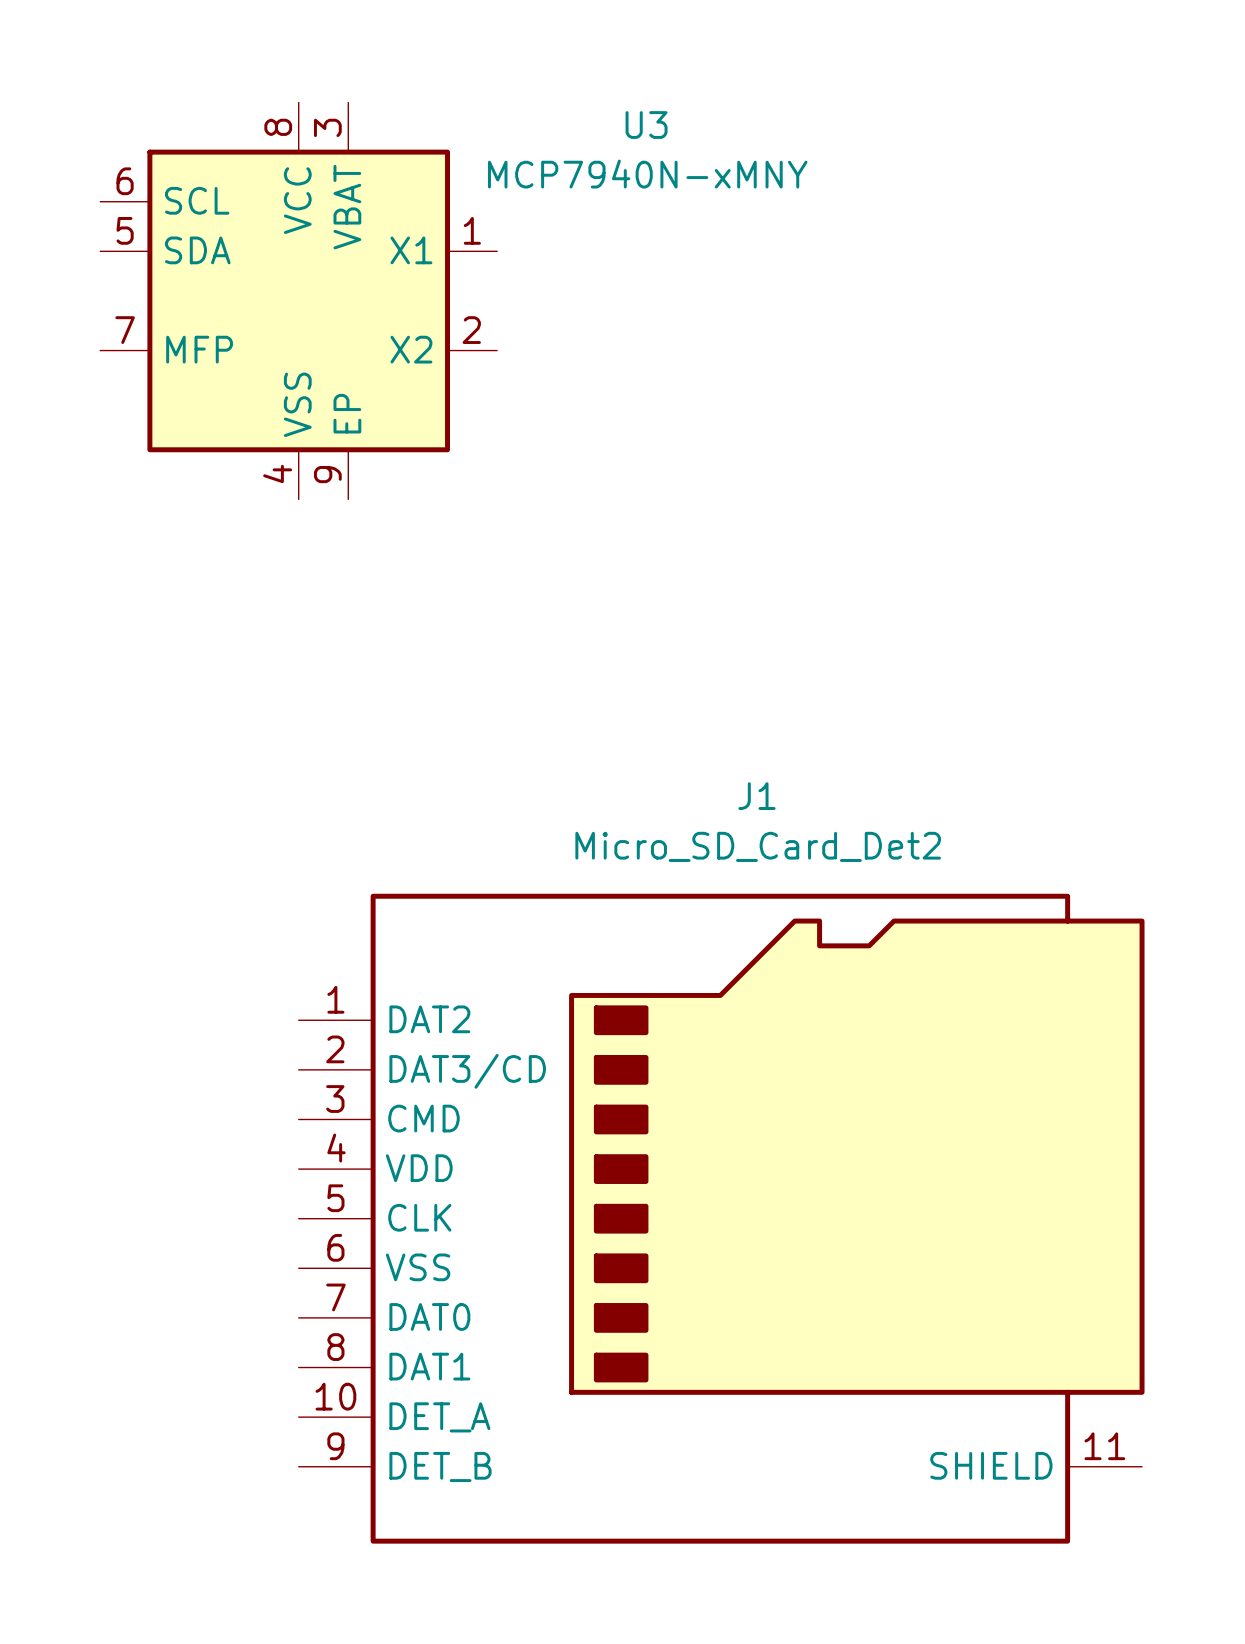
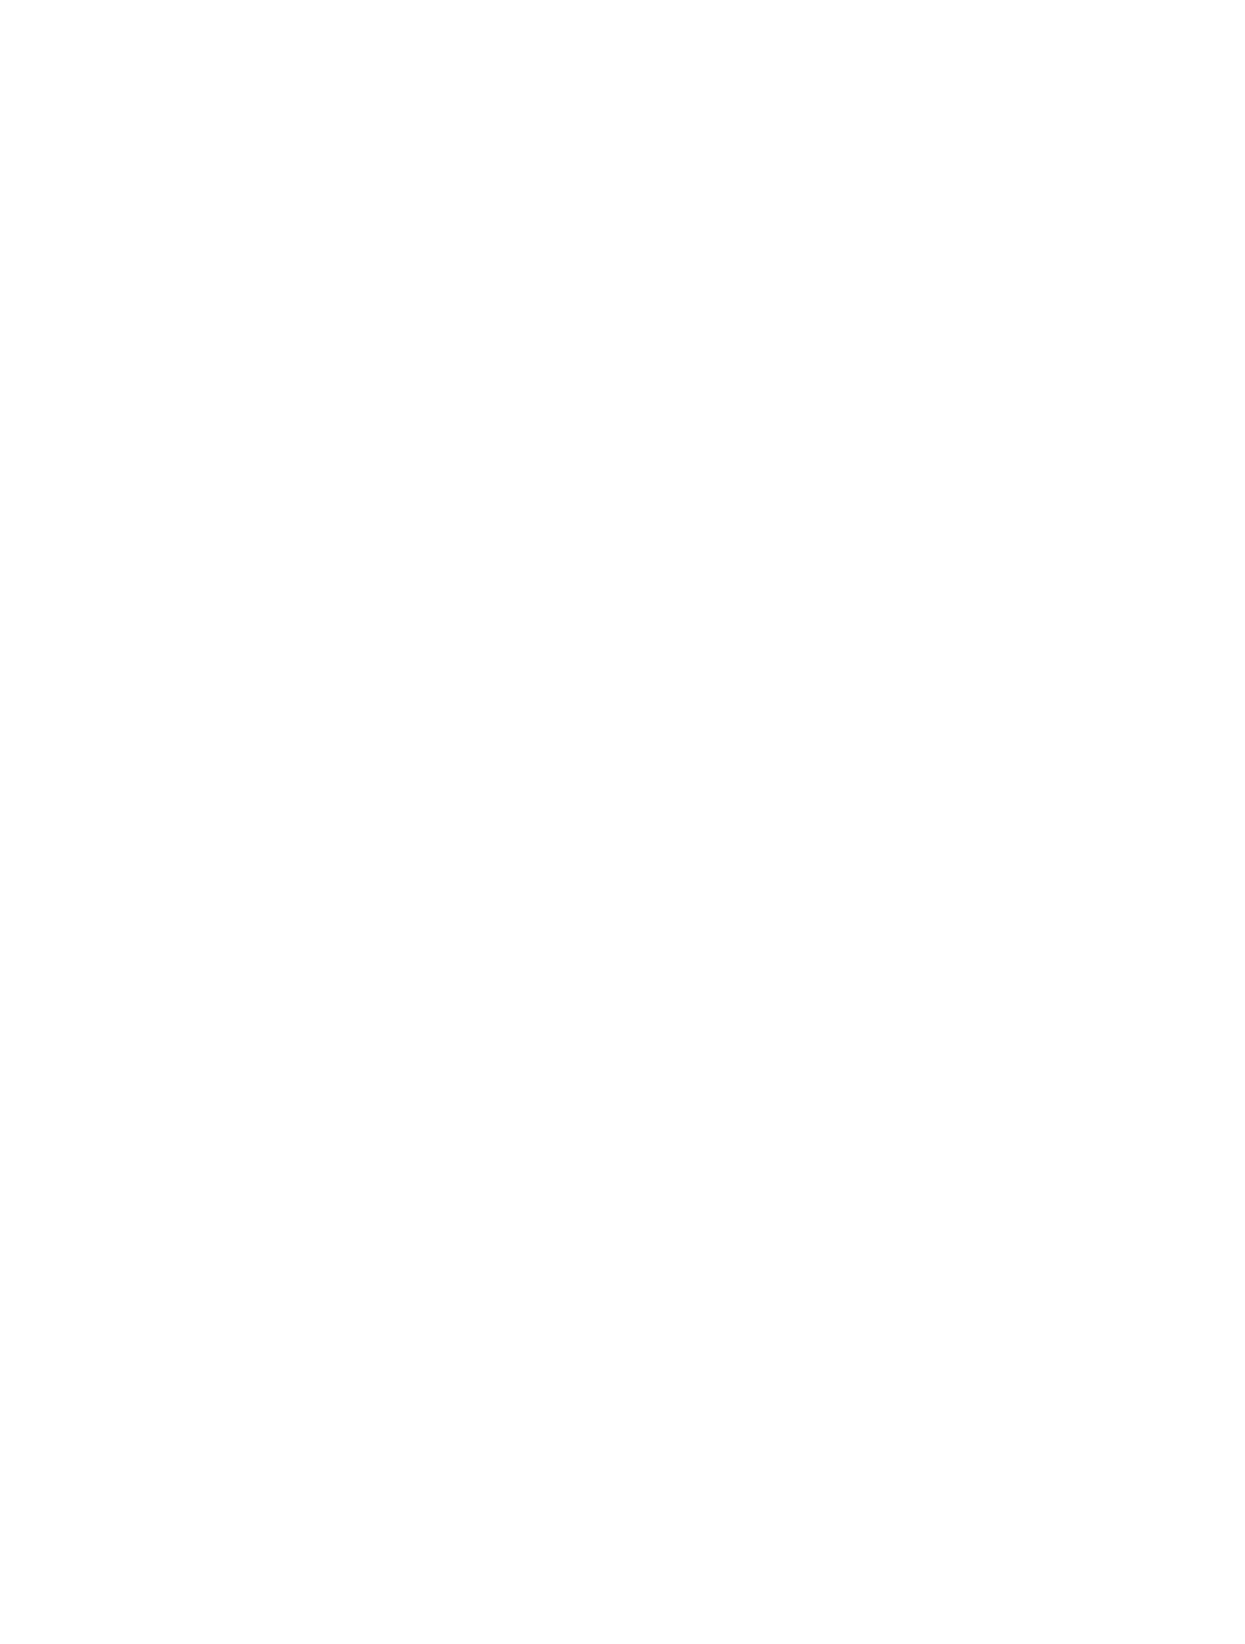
U3: MCP7940N-xMNY (298, 300) -> none
J1: Micro_SD_Card_Det2 (721, 1218) -> none

